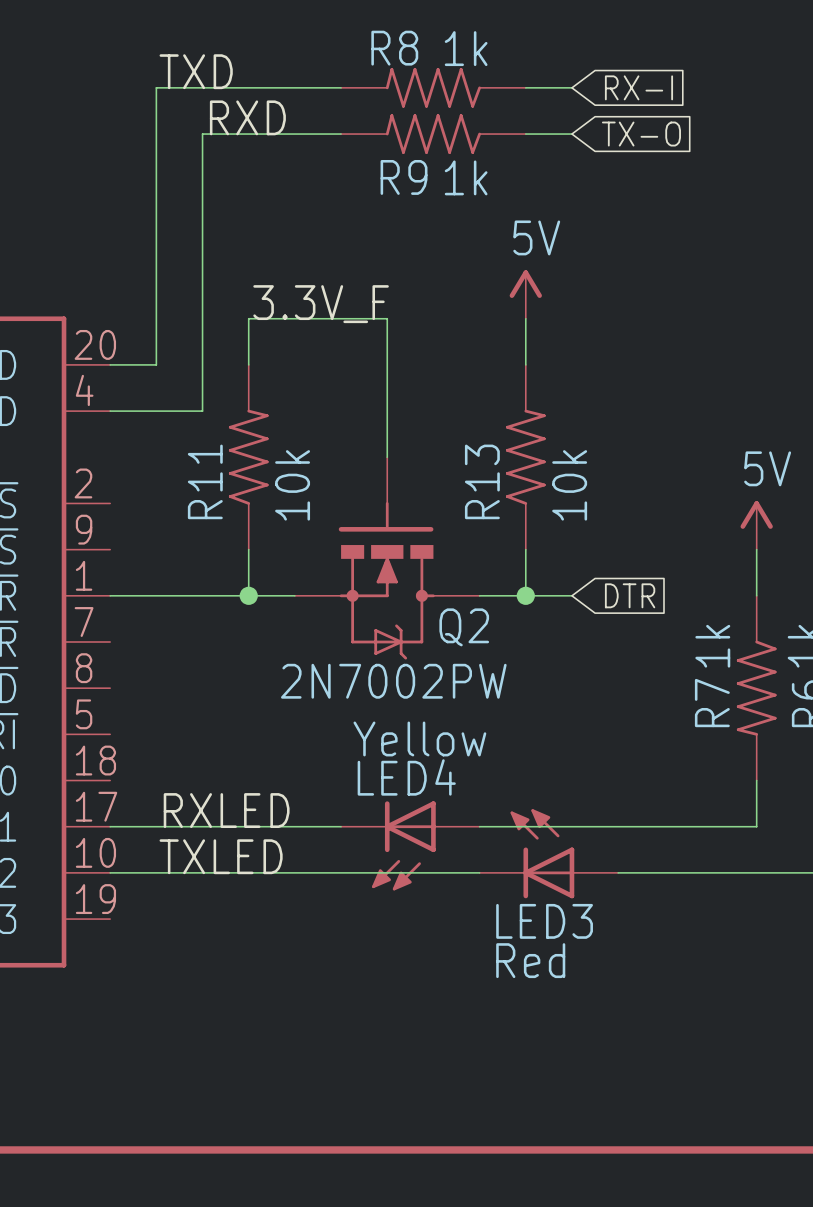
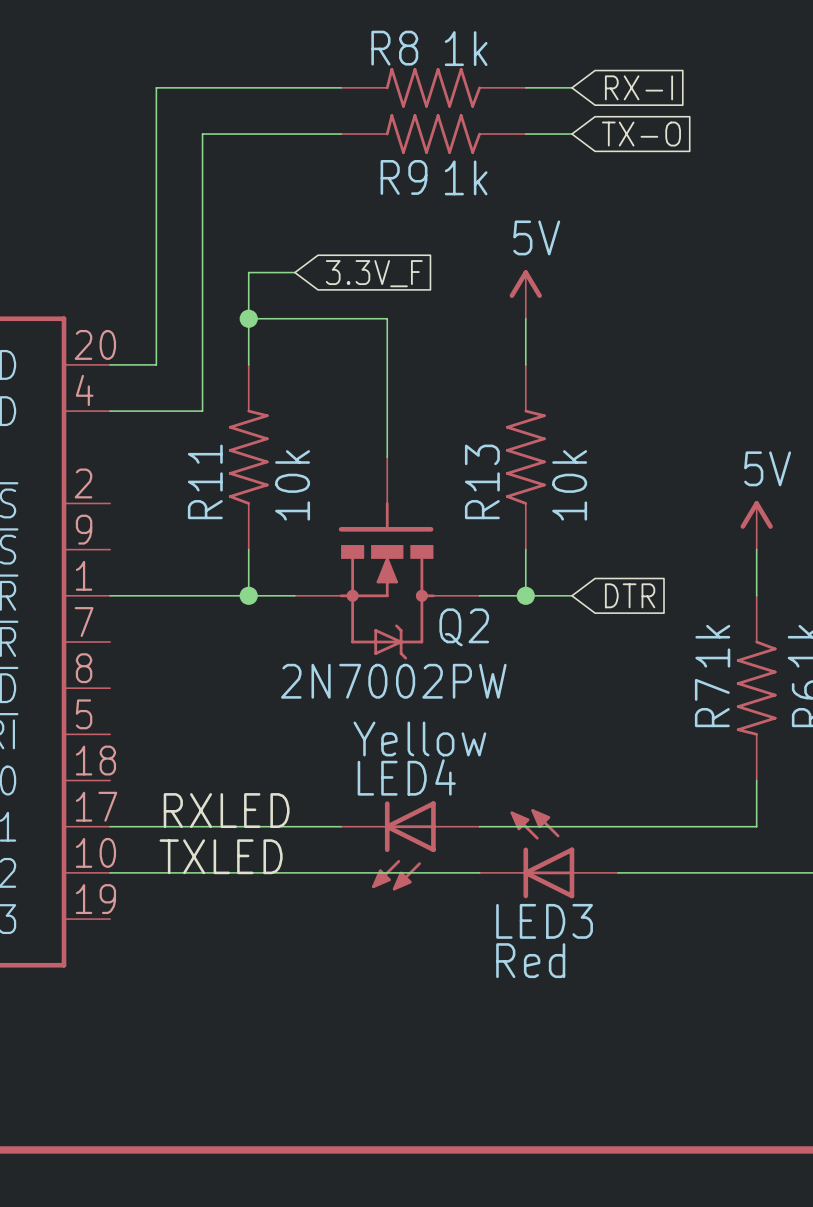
label: TXD (196, 71) -> none
label: RXD (247, 117) -> none
wire: none -> (294, 272) (248, 272) (248, 318)
global label: none -> 3.3V_F (374, 273)
label: 3.3V_F (321, 304) -> none
junction: none -> (248, 318)

